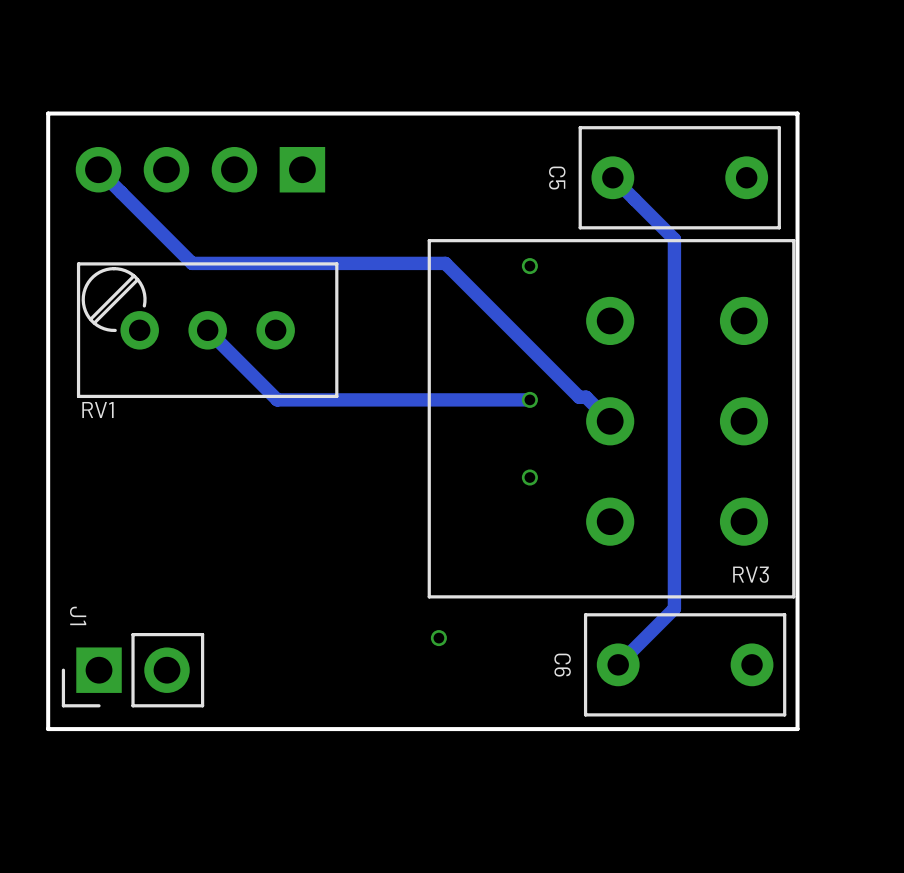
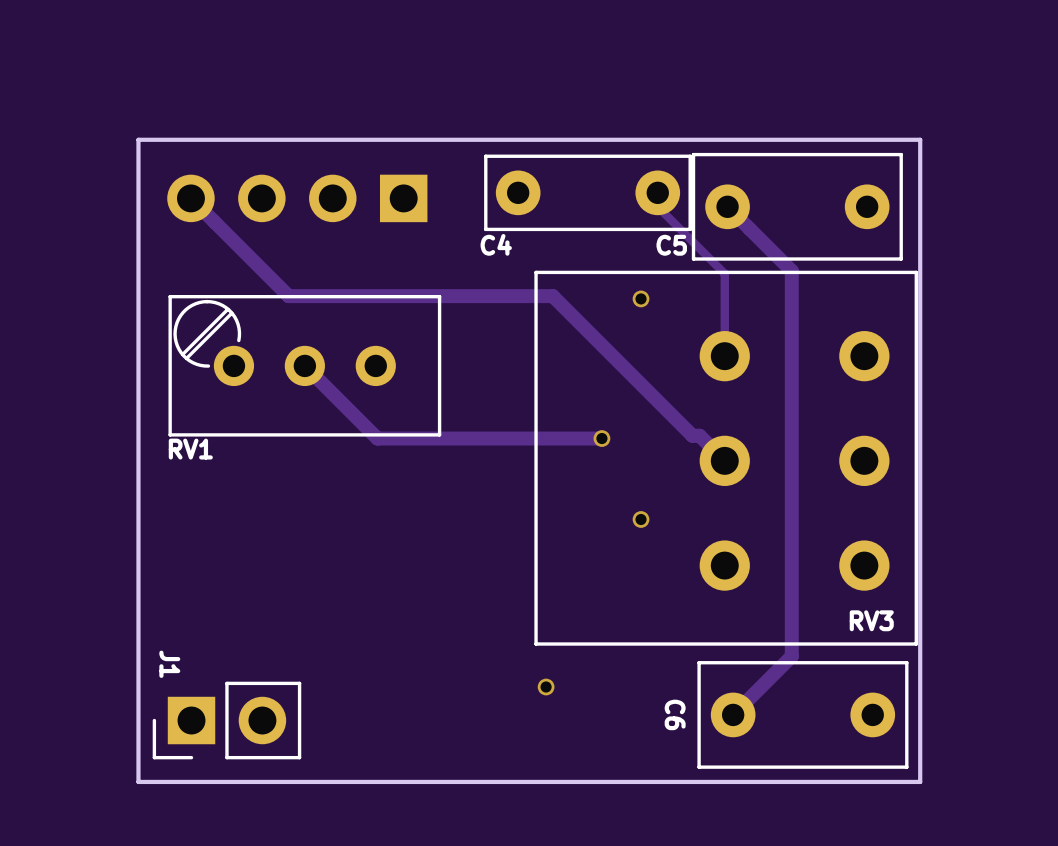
C4: none -> (587, 192)
track: none -> (657, 206) (724, 273) (724, 356)
C5 name rotation: 0° (557, 178) -> 90° counterclockwise (671, 245)
track: (529, 399) (492, 399) -> none
via position: (529, 399) -> (601, 438)

